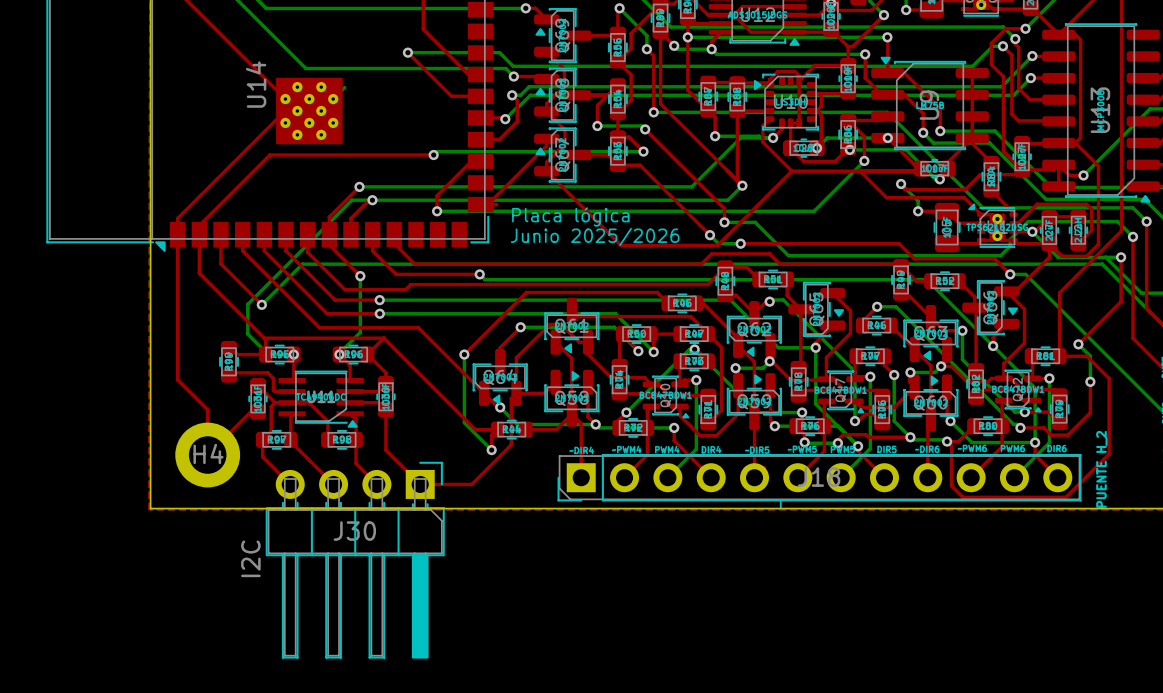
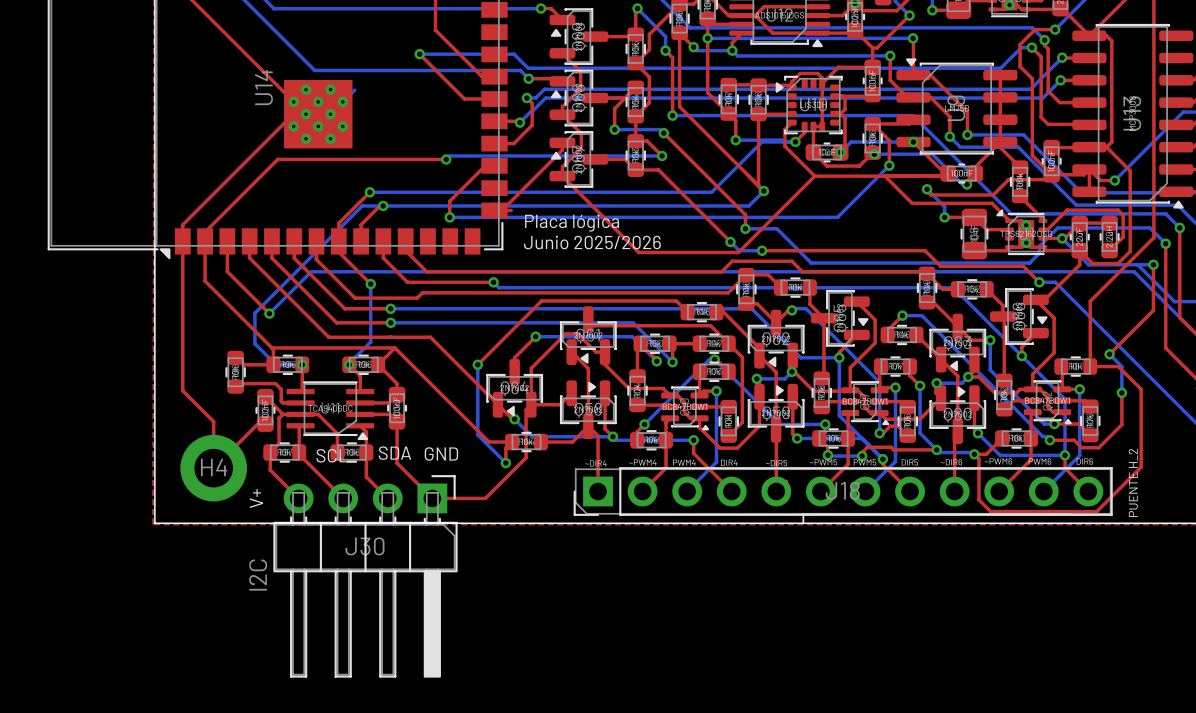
text: none -> SDA (394, 453)
text: none -> GND (441, 454)
text: none -> SCL (332, 455)
text: none -> V+ (256, 498)

